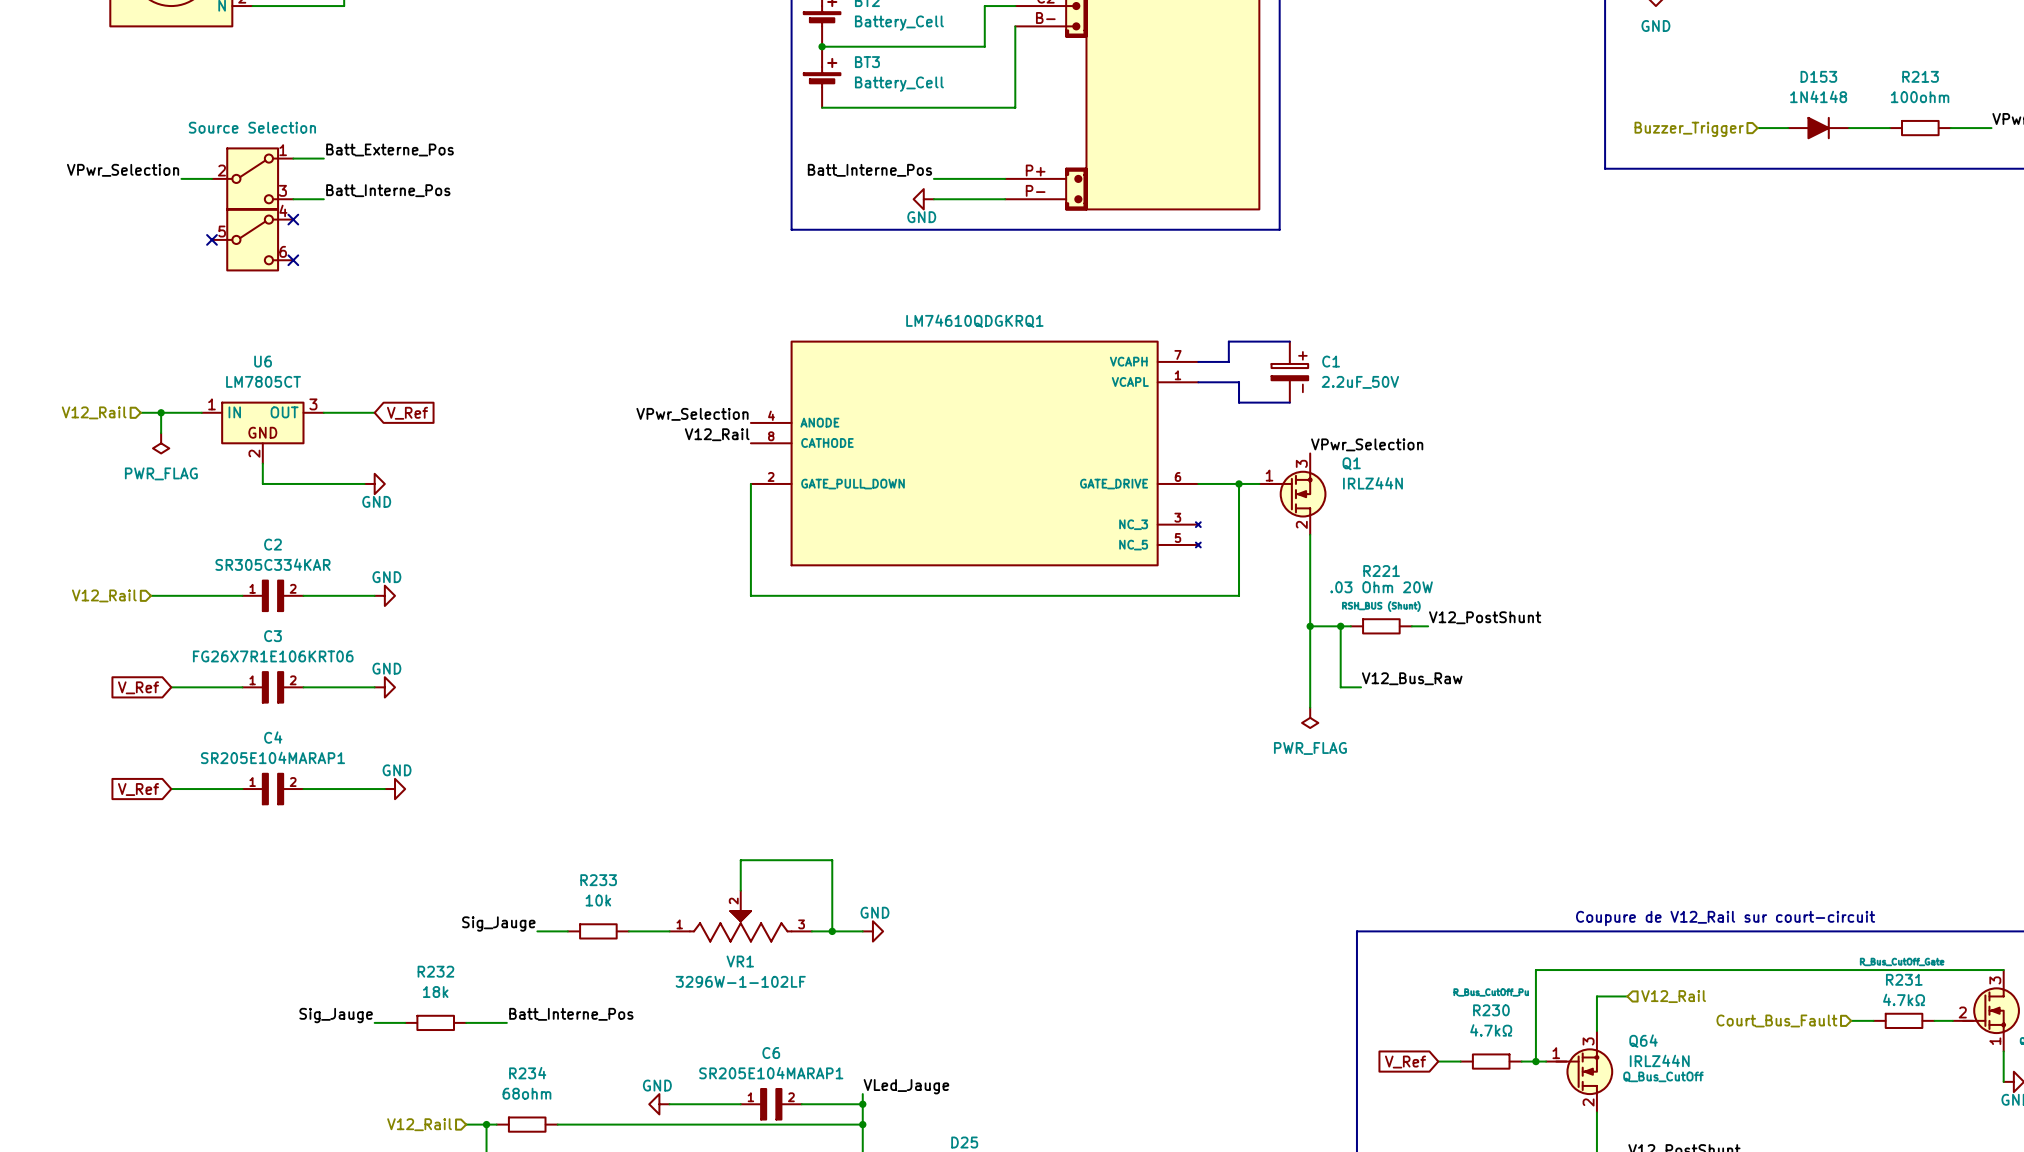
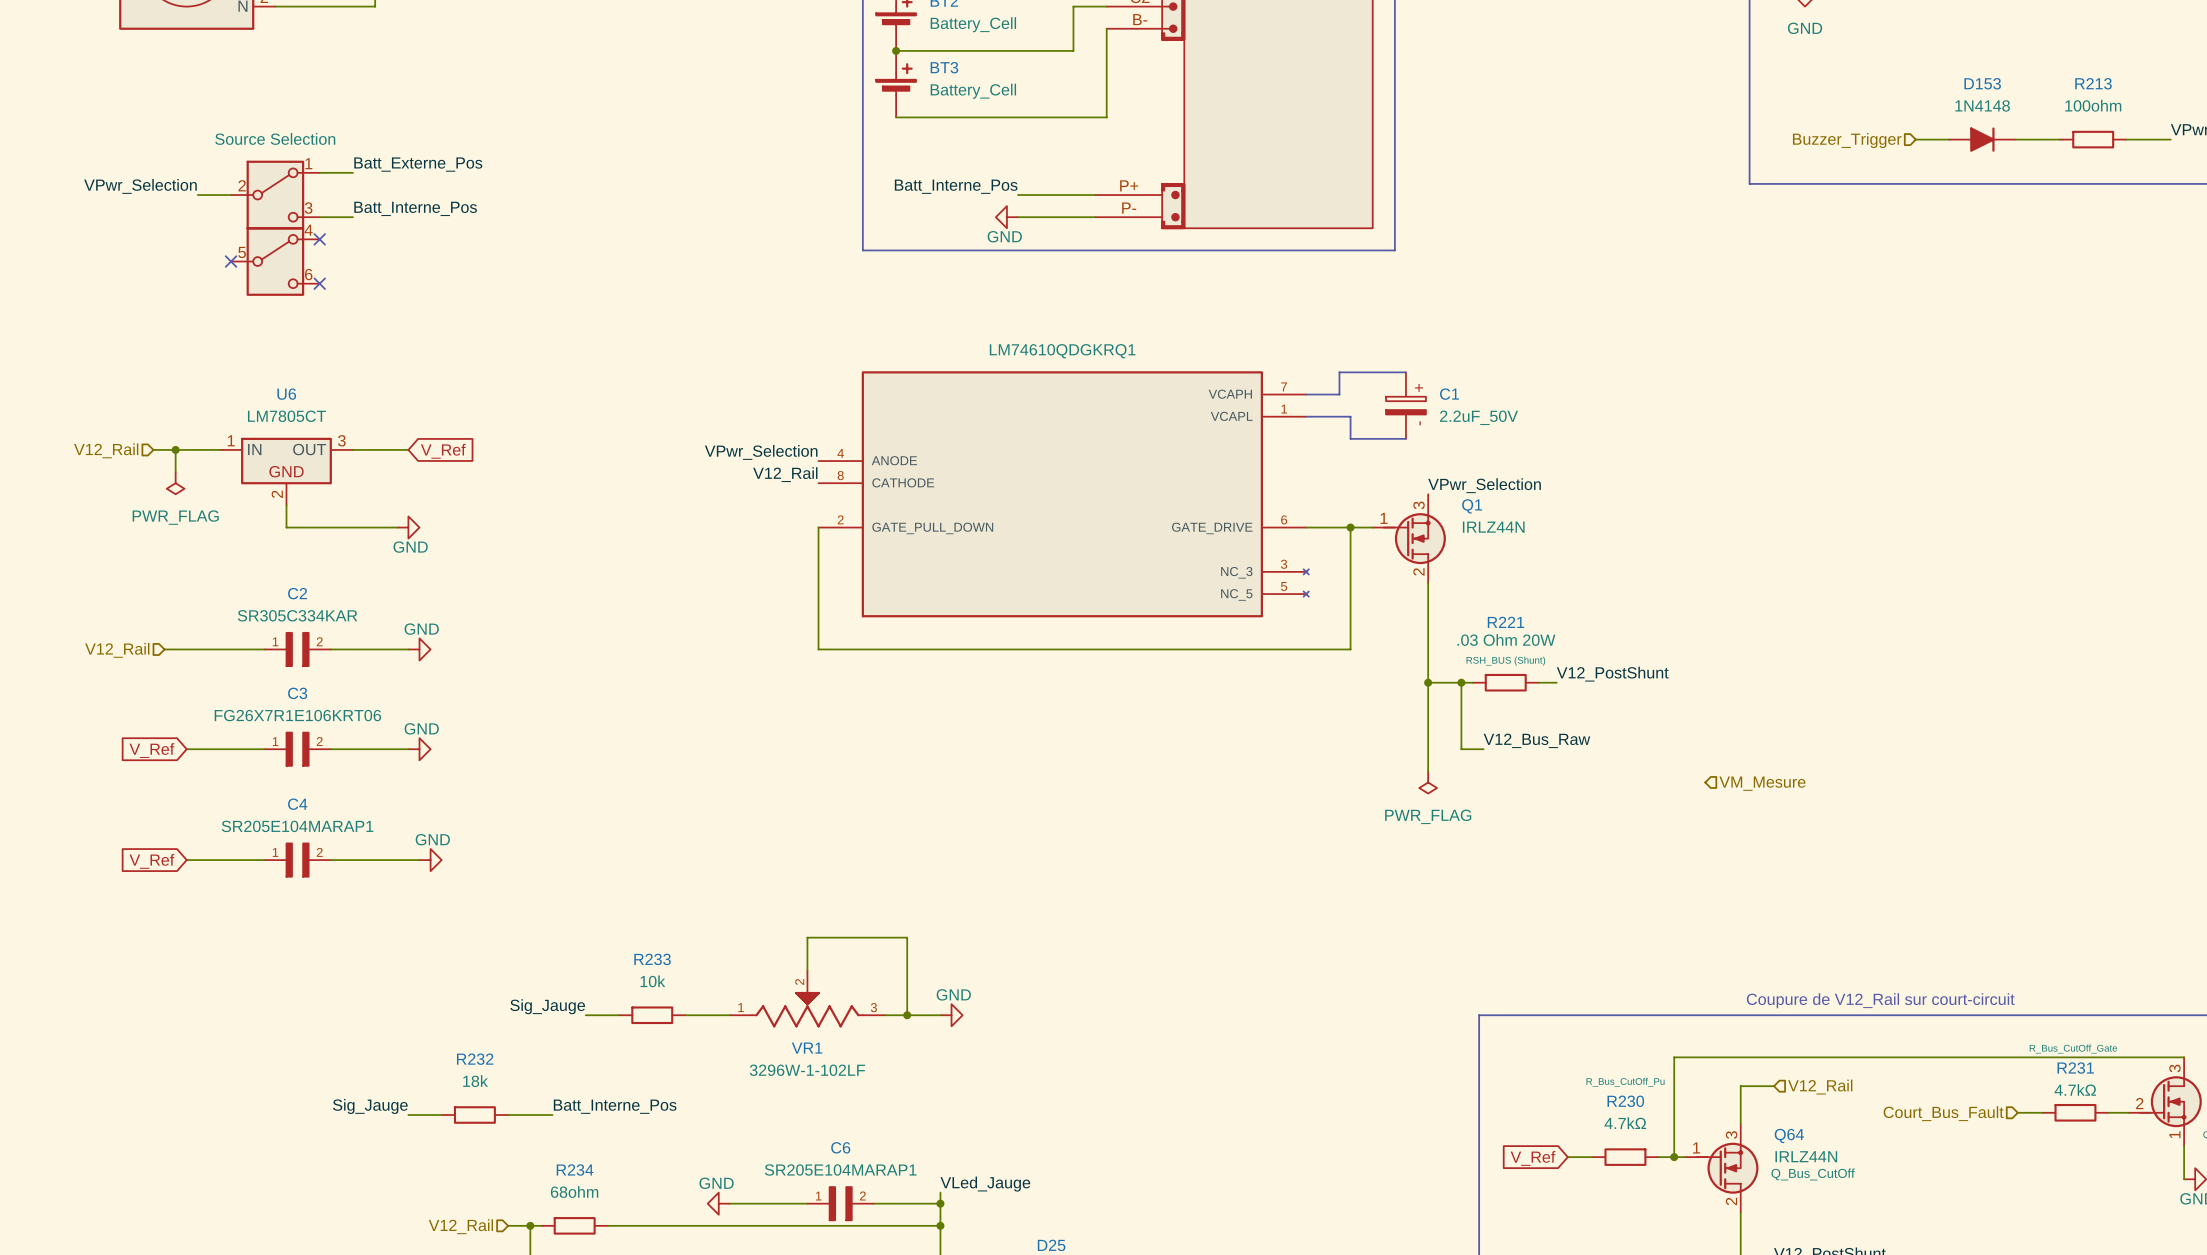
hierarchical label: none -> VM_Mesure (1762, 783)

